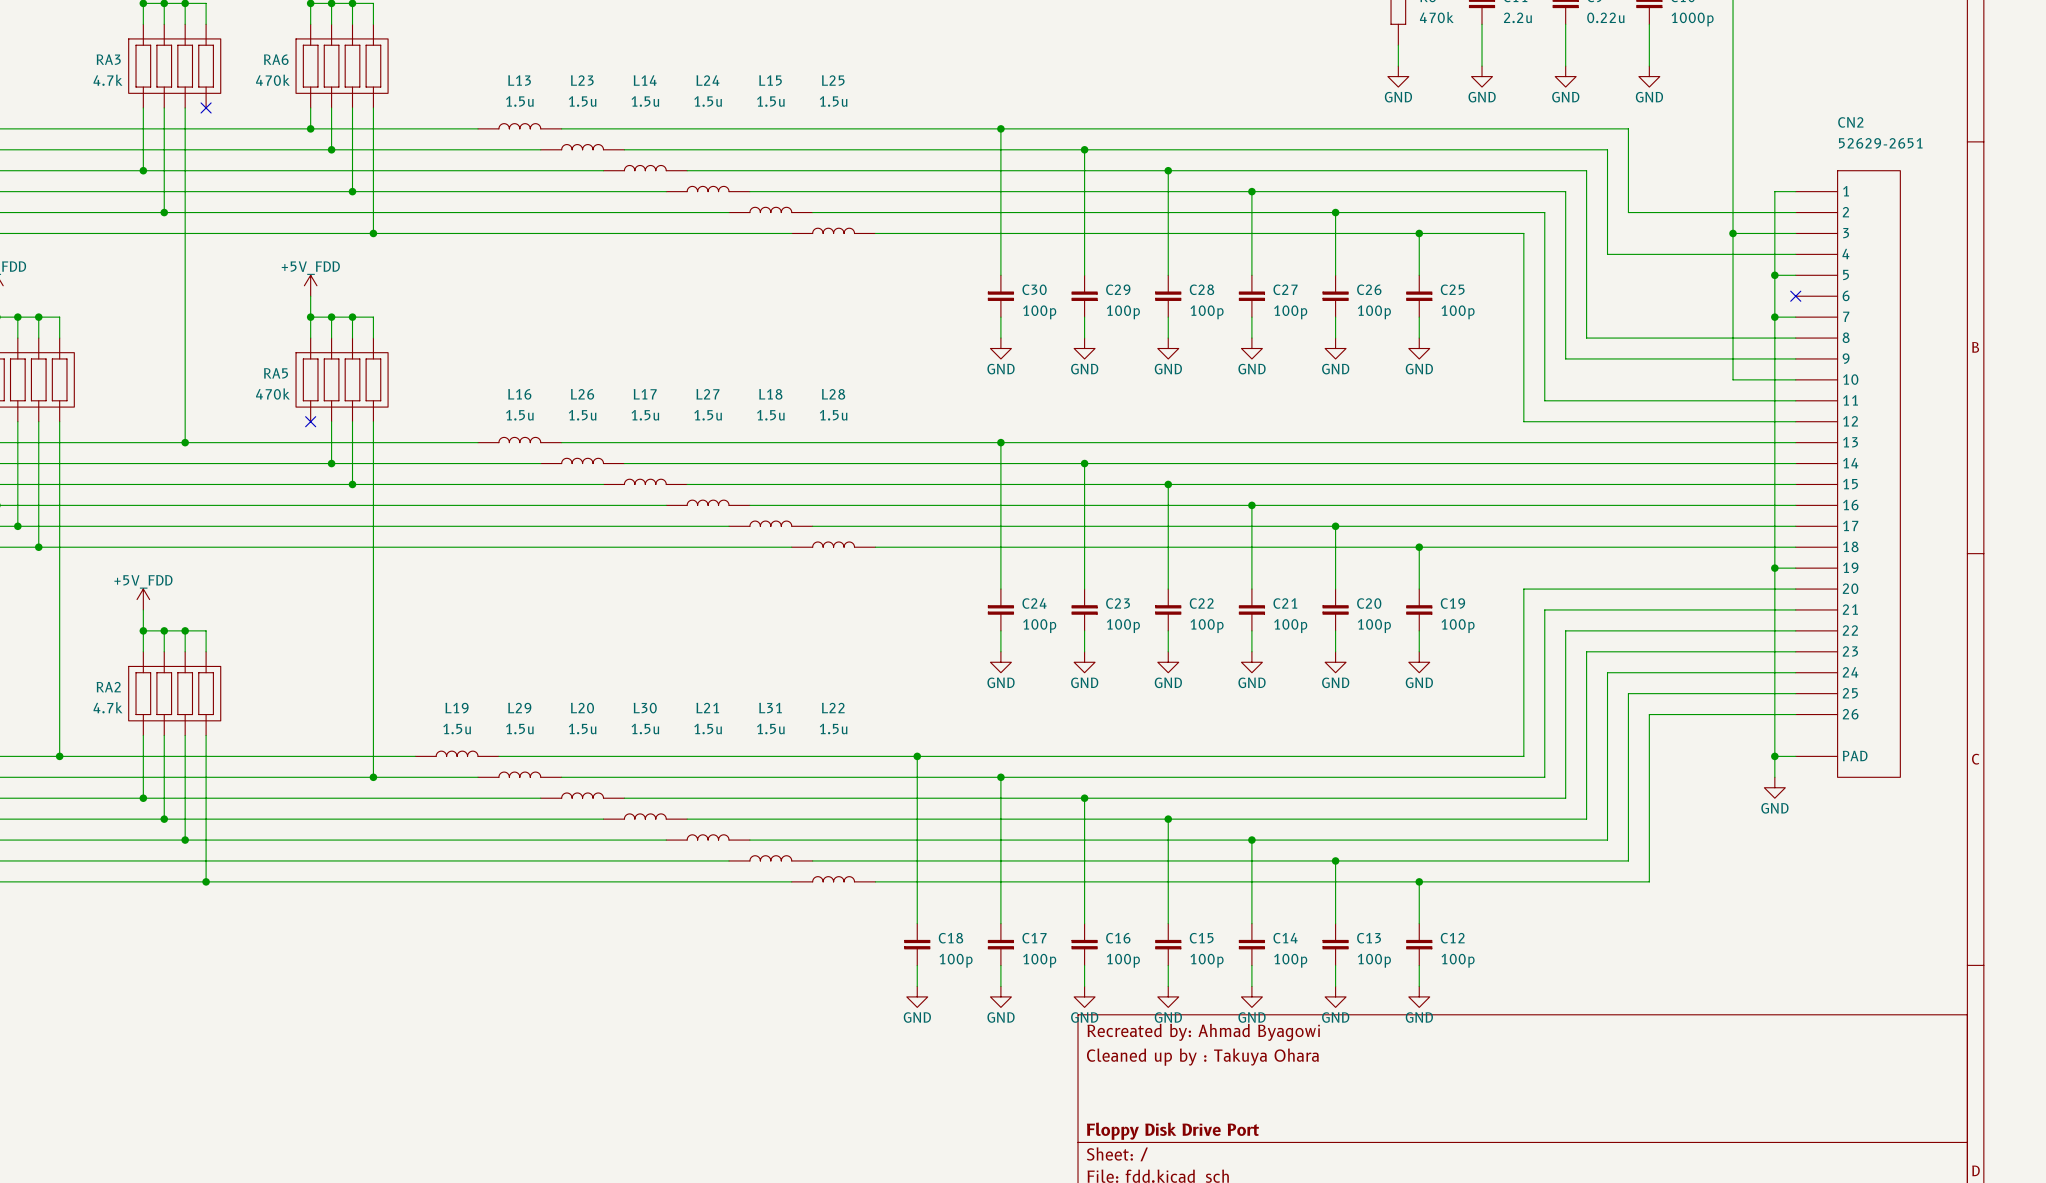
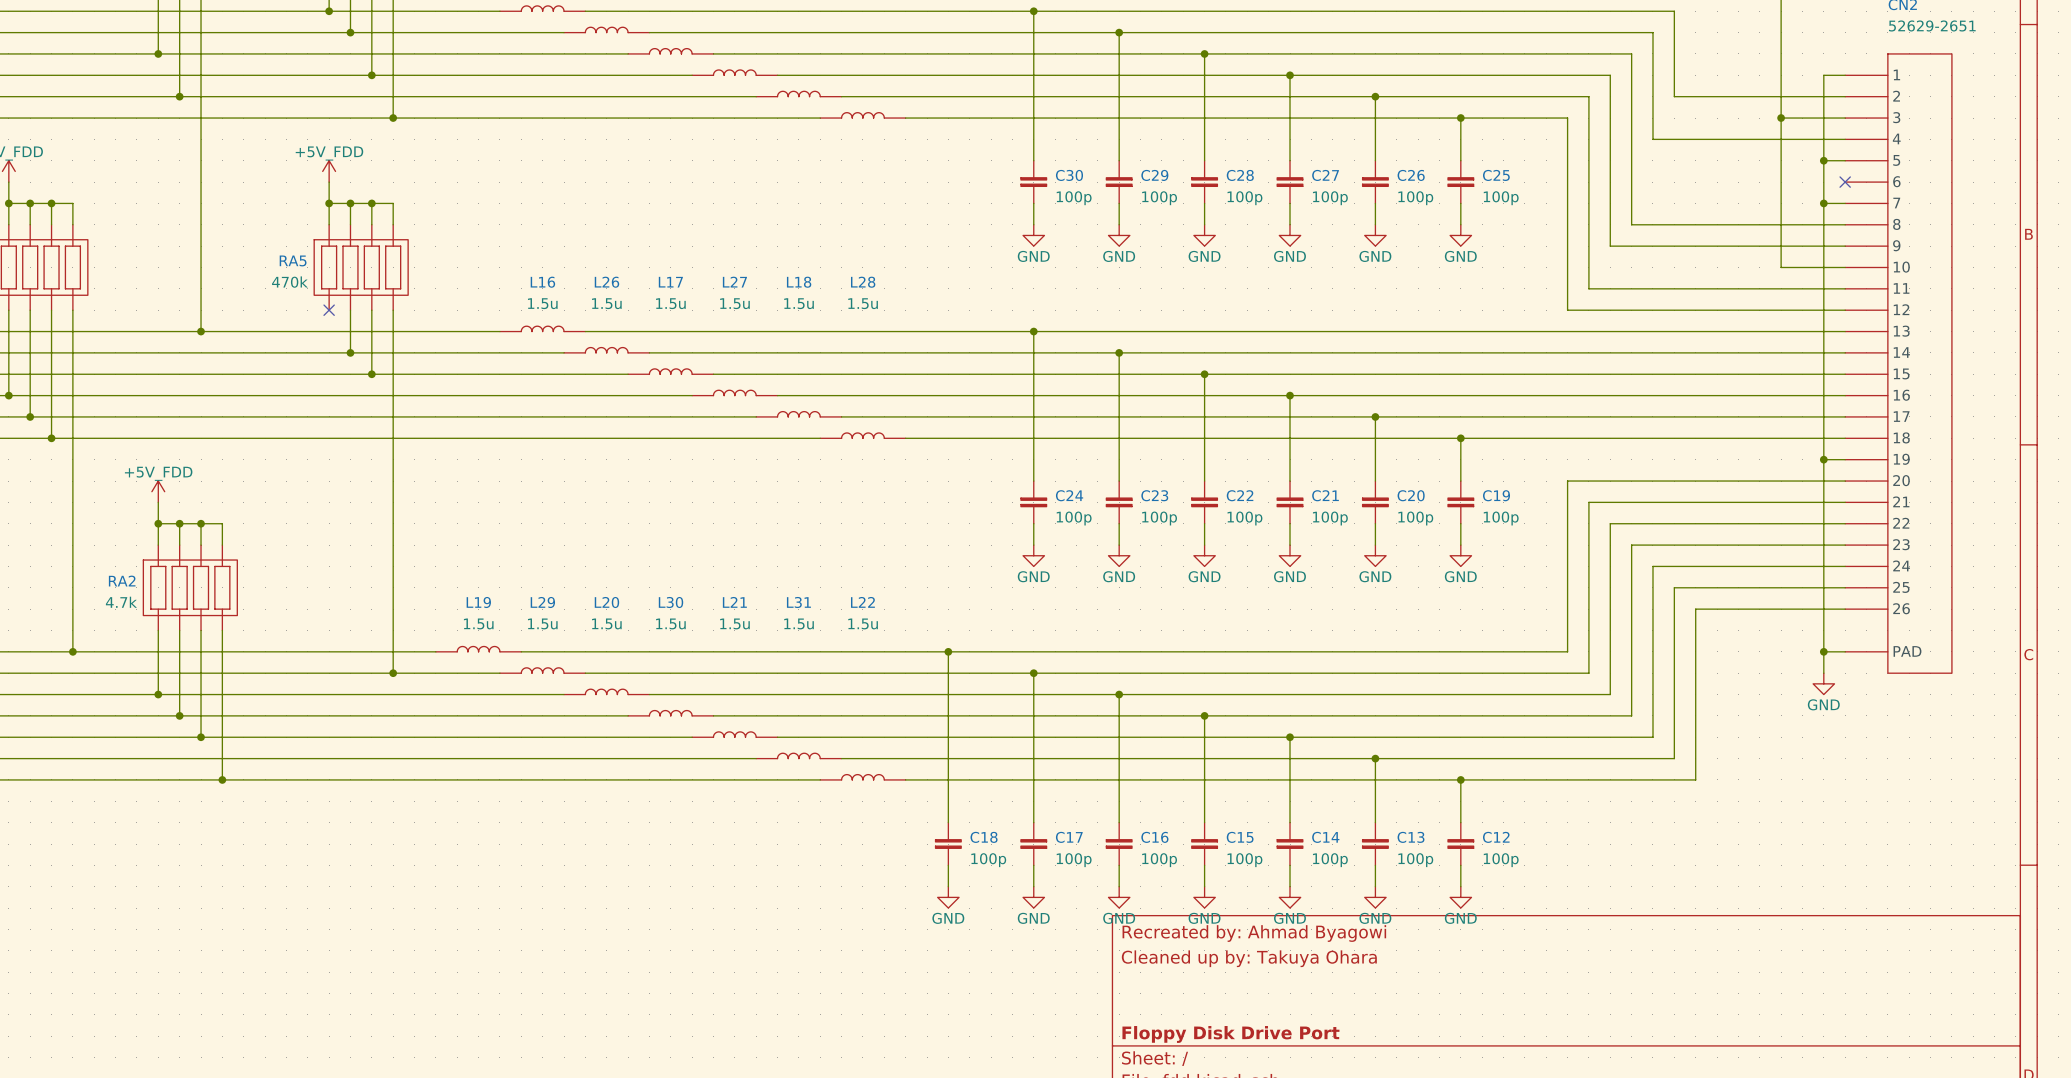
title block: Cleaned up by : Takuya Ohara (1202, 1057) -> Cleaned up by: Takuya Ohara (1249, 958)

